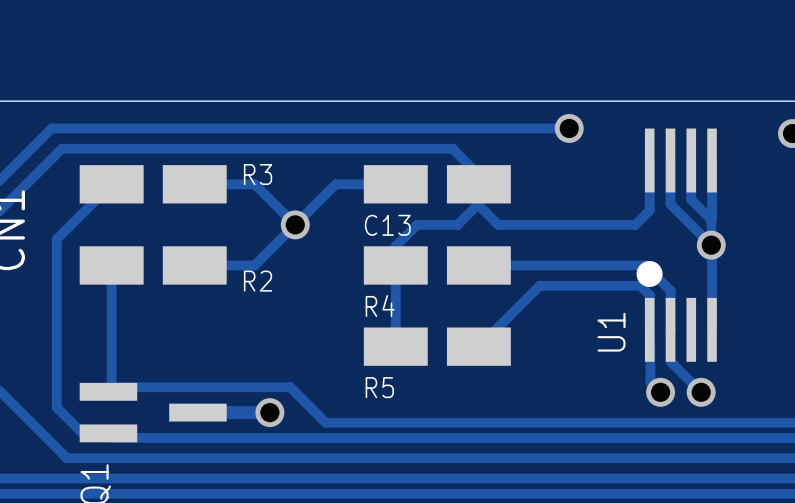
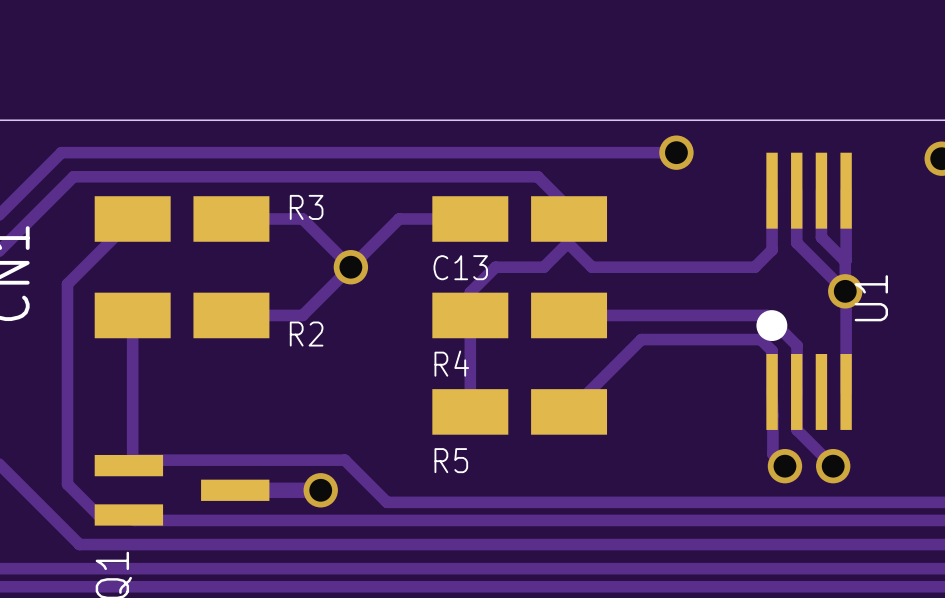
U1 name position: U1 (611, 332) -> U1 (871, 298)

